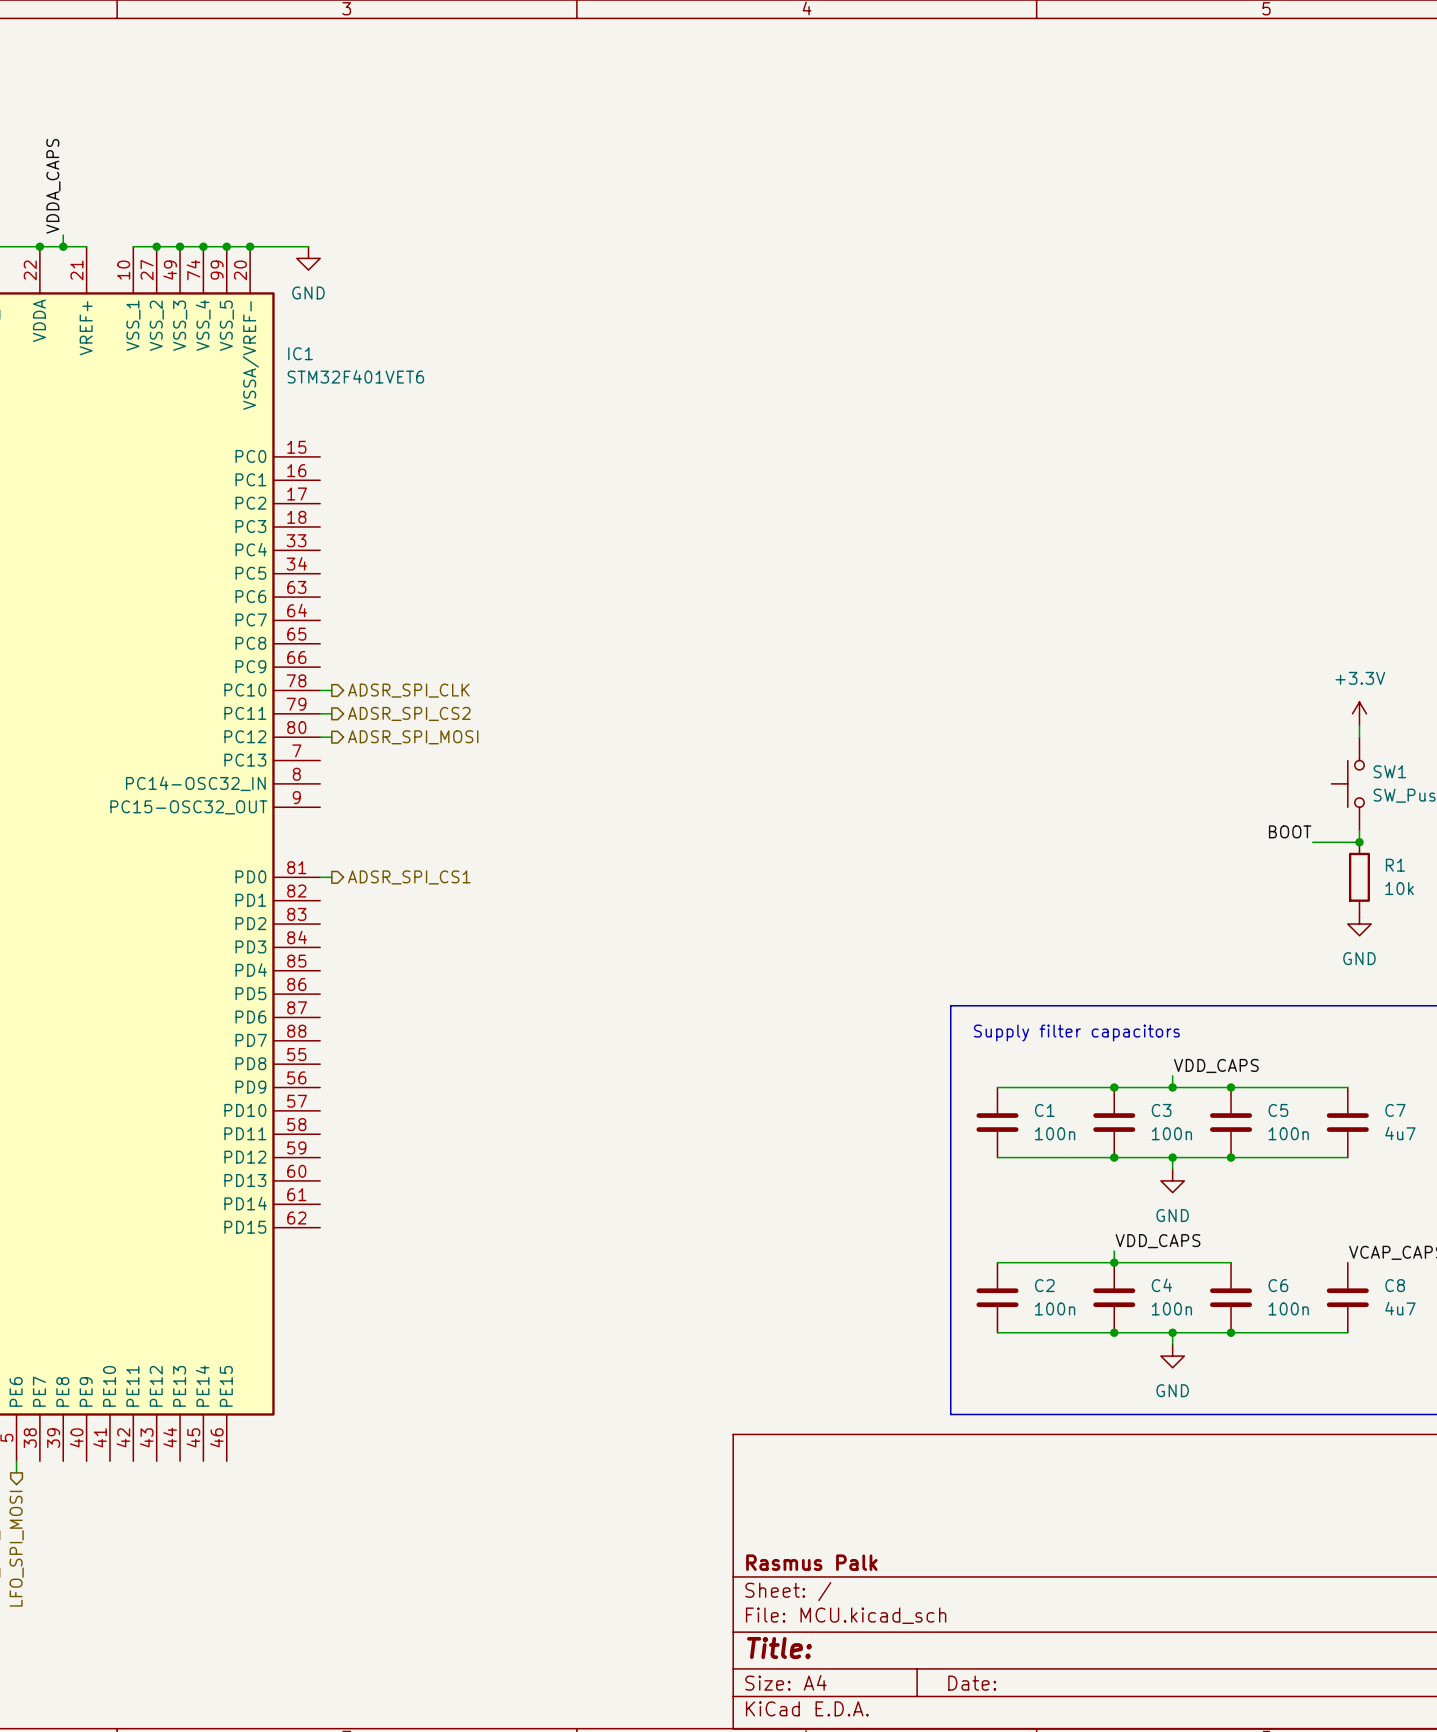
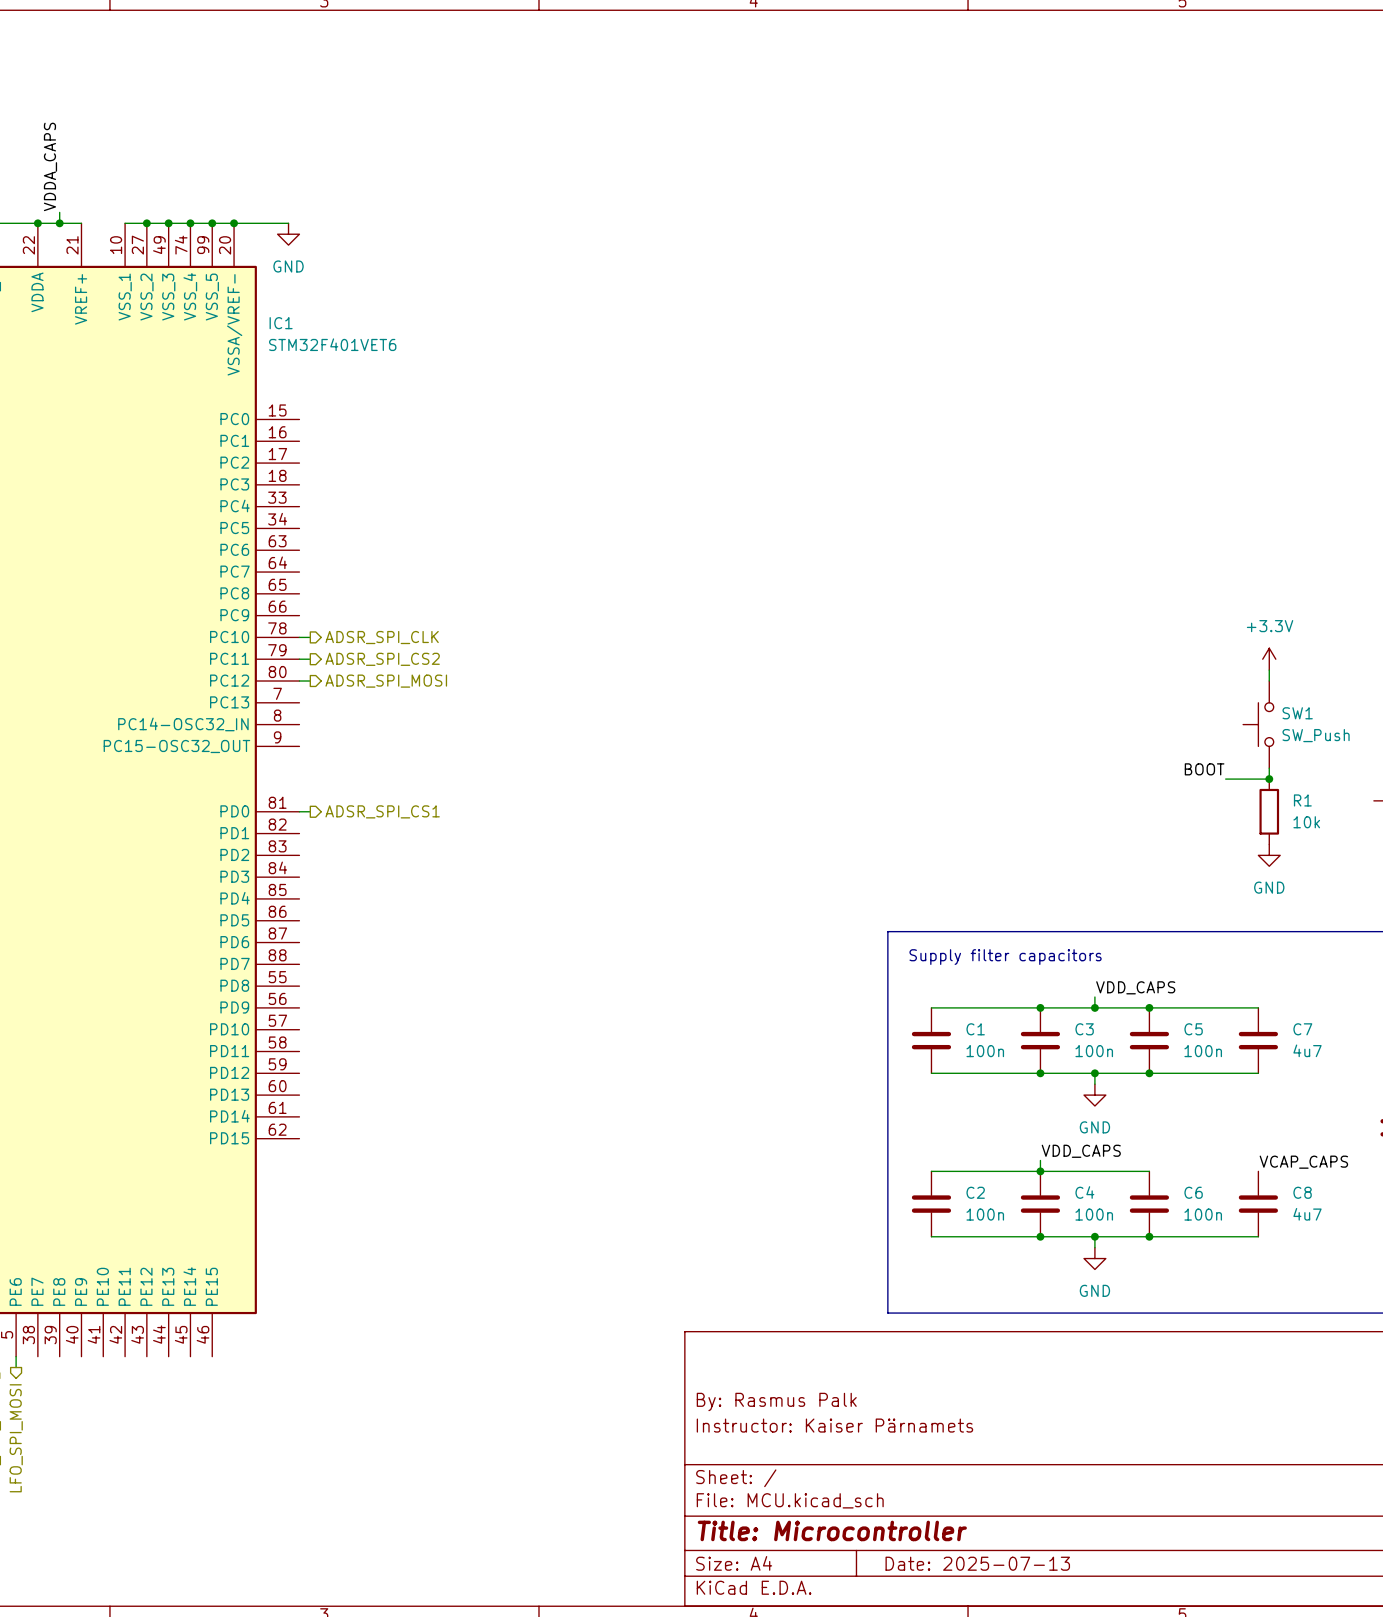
title block: none -> By: Rasmus Palk (776, 1401)
title block: none -> Instructor: Kaiser Pärnamets (834, 1425)
title block: Rasmus Palk (811, 1562) -> none
title block: Title: (779, 1648) -> Title: Microcontroller (832, 1530)
title block: Date: (972, 1683) -> Date: 2025-07-13 (977, 1563)

